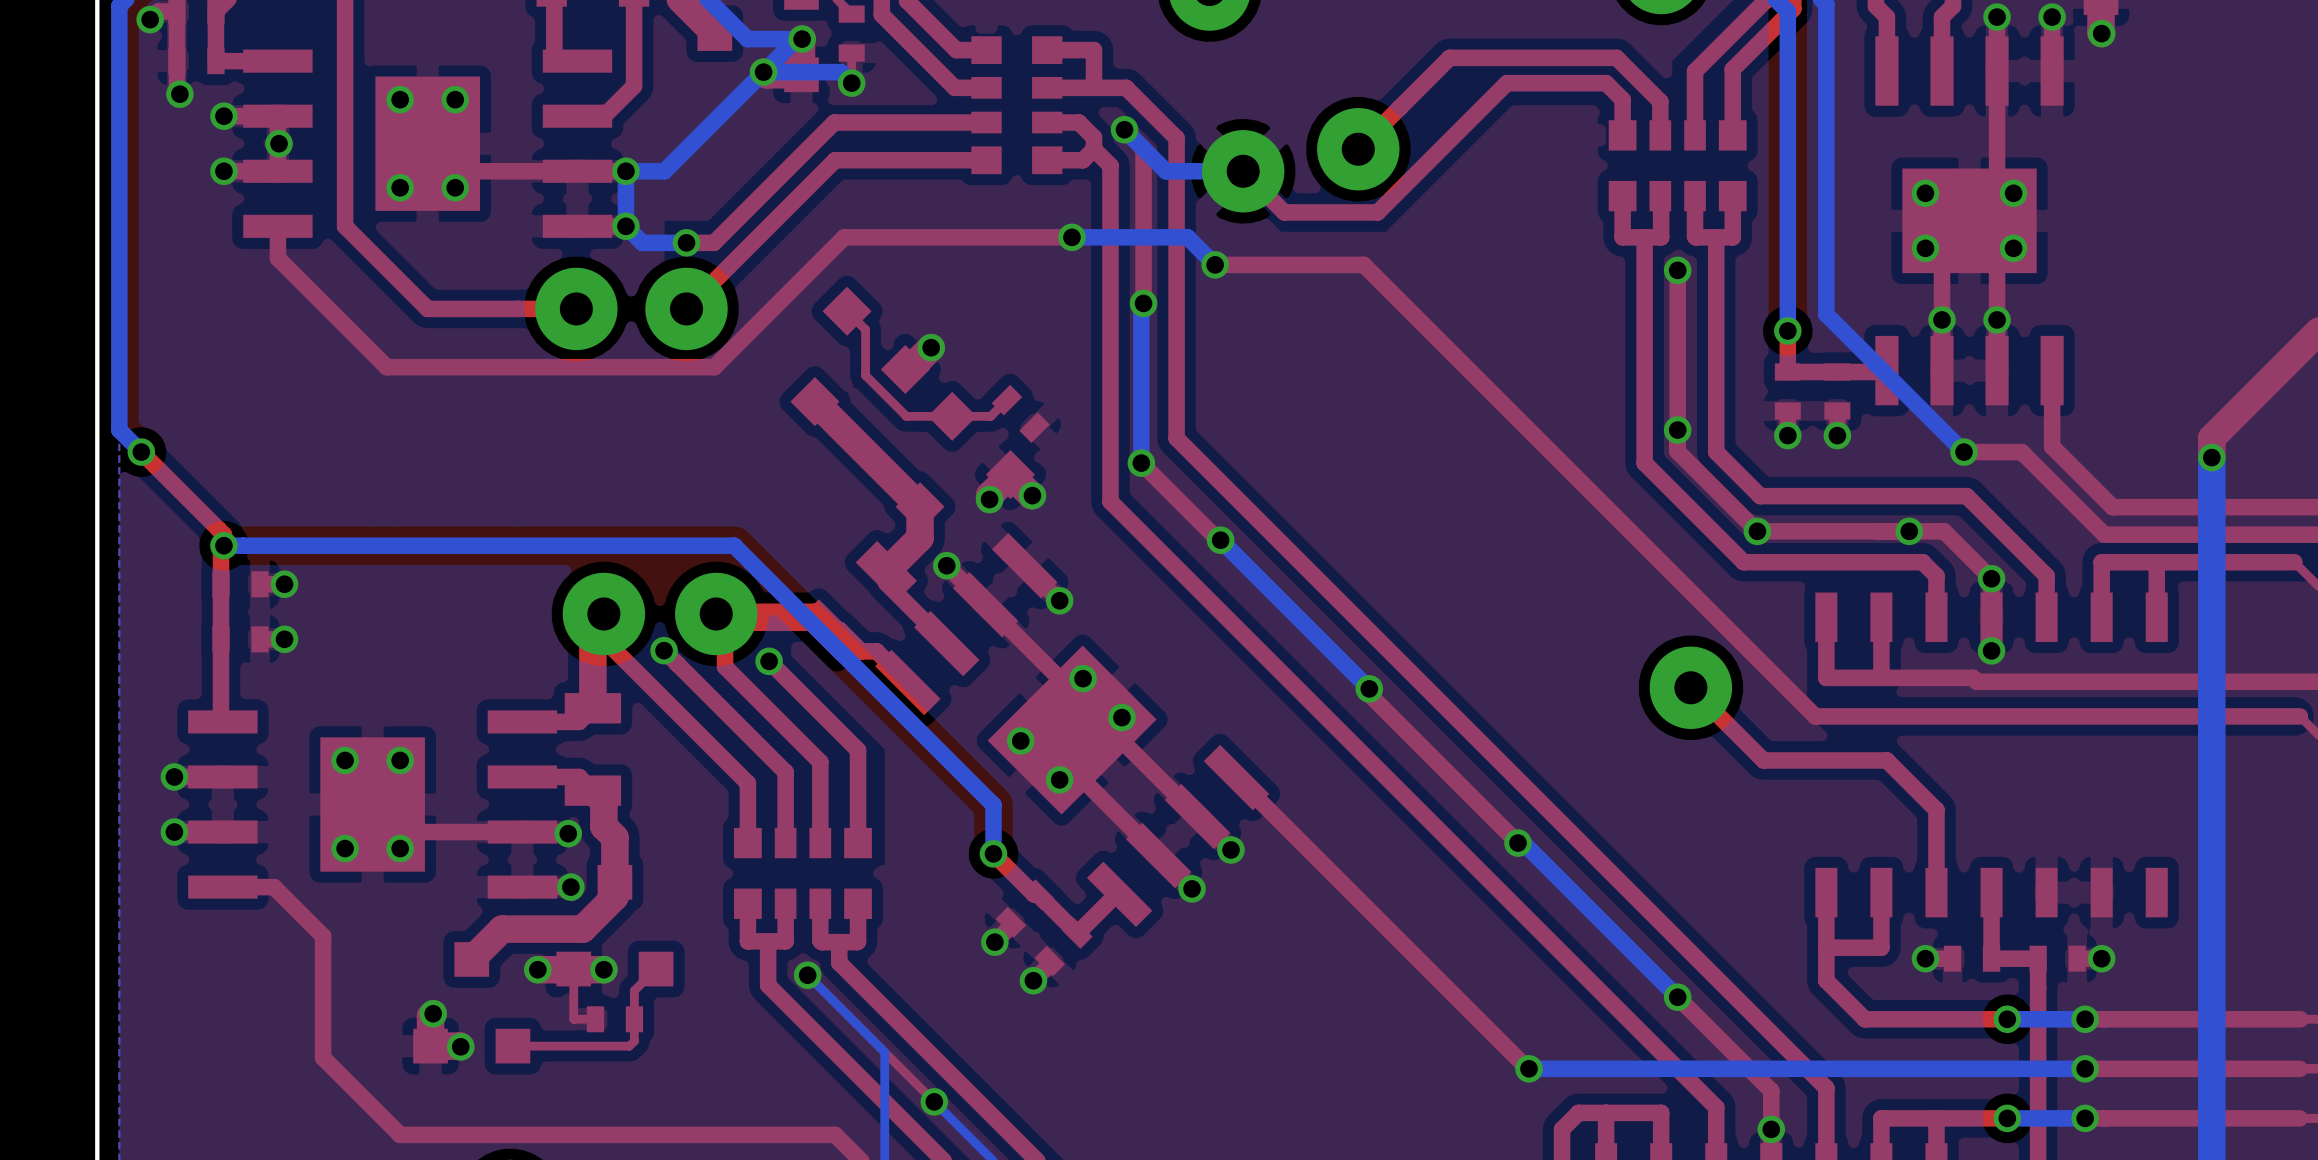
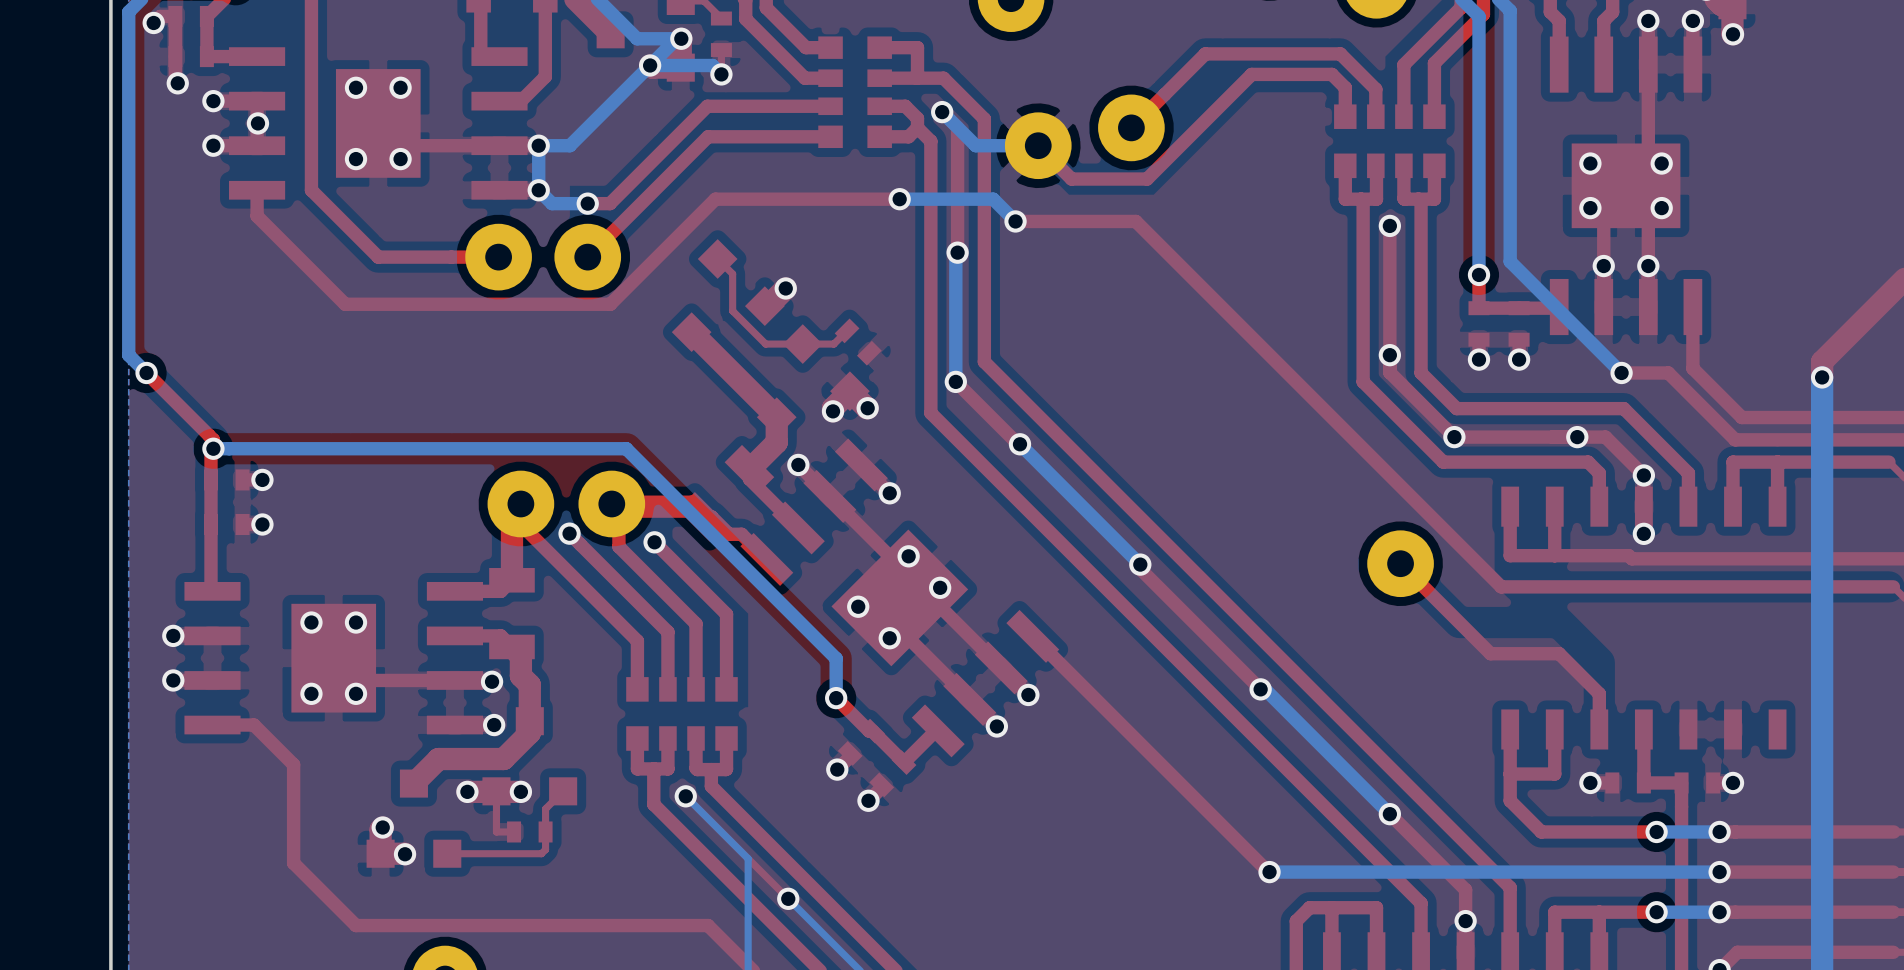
top track: (1763, 760) (1886, 760) (1936, 810) (1936, 848) -> (1459, 622) (1490, 653) (1559, 653) (1599, 693)

